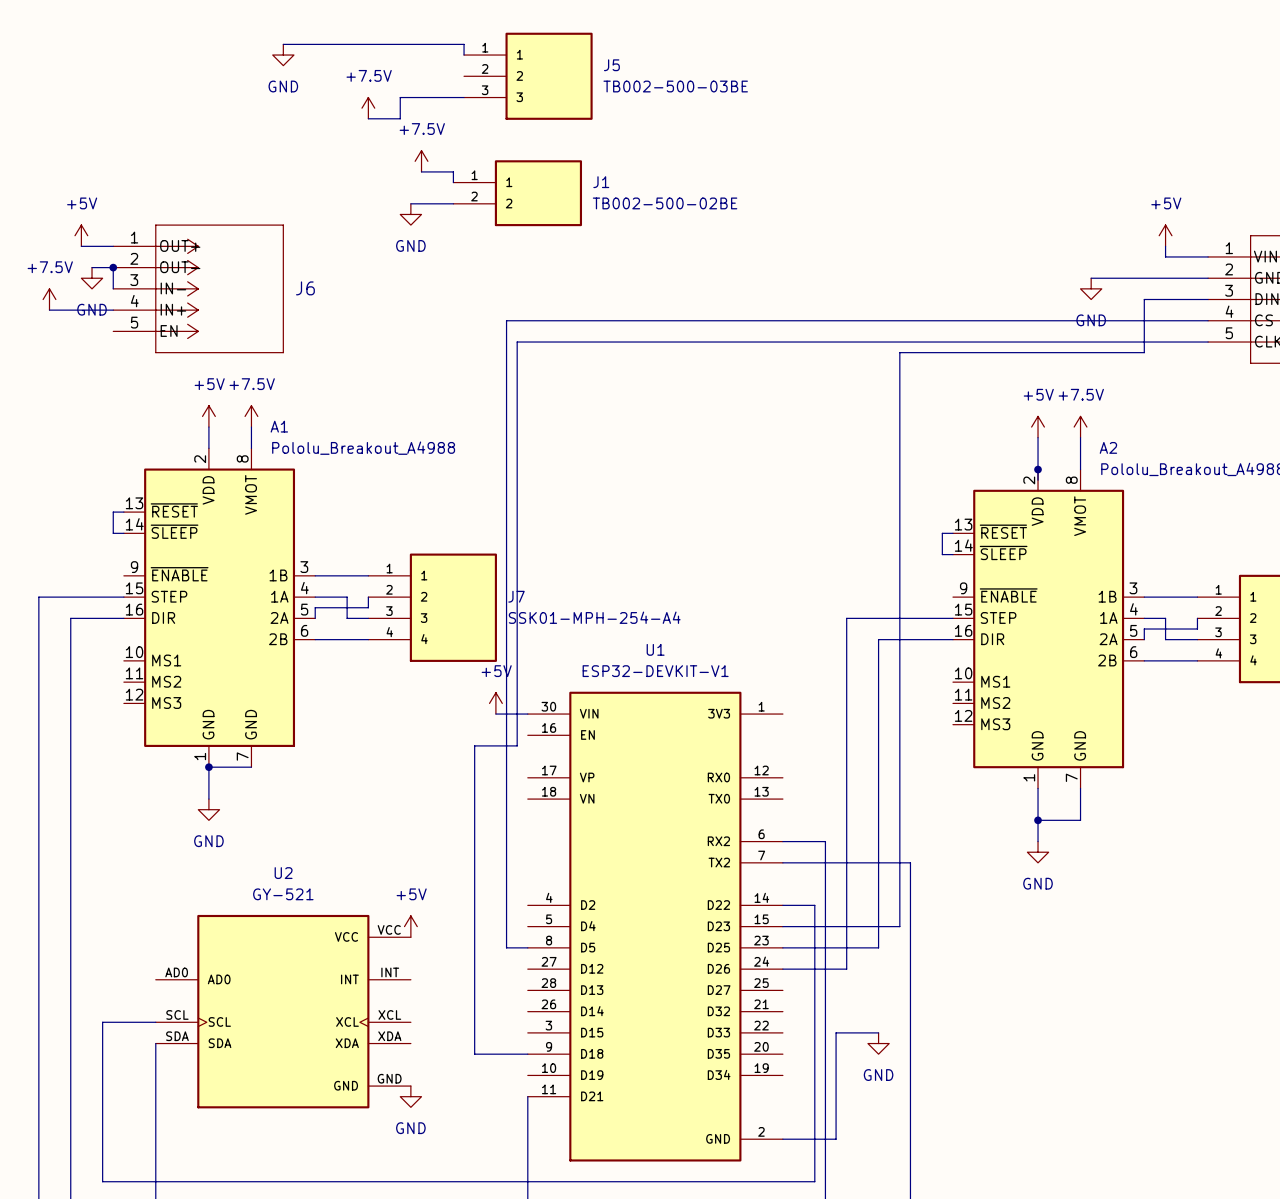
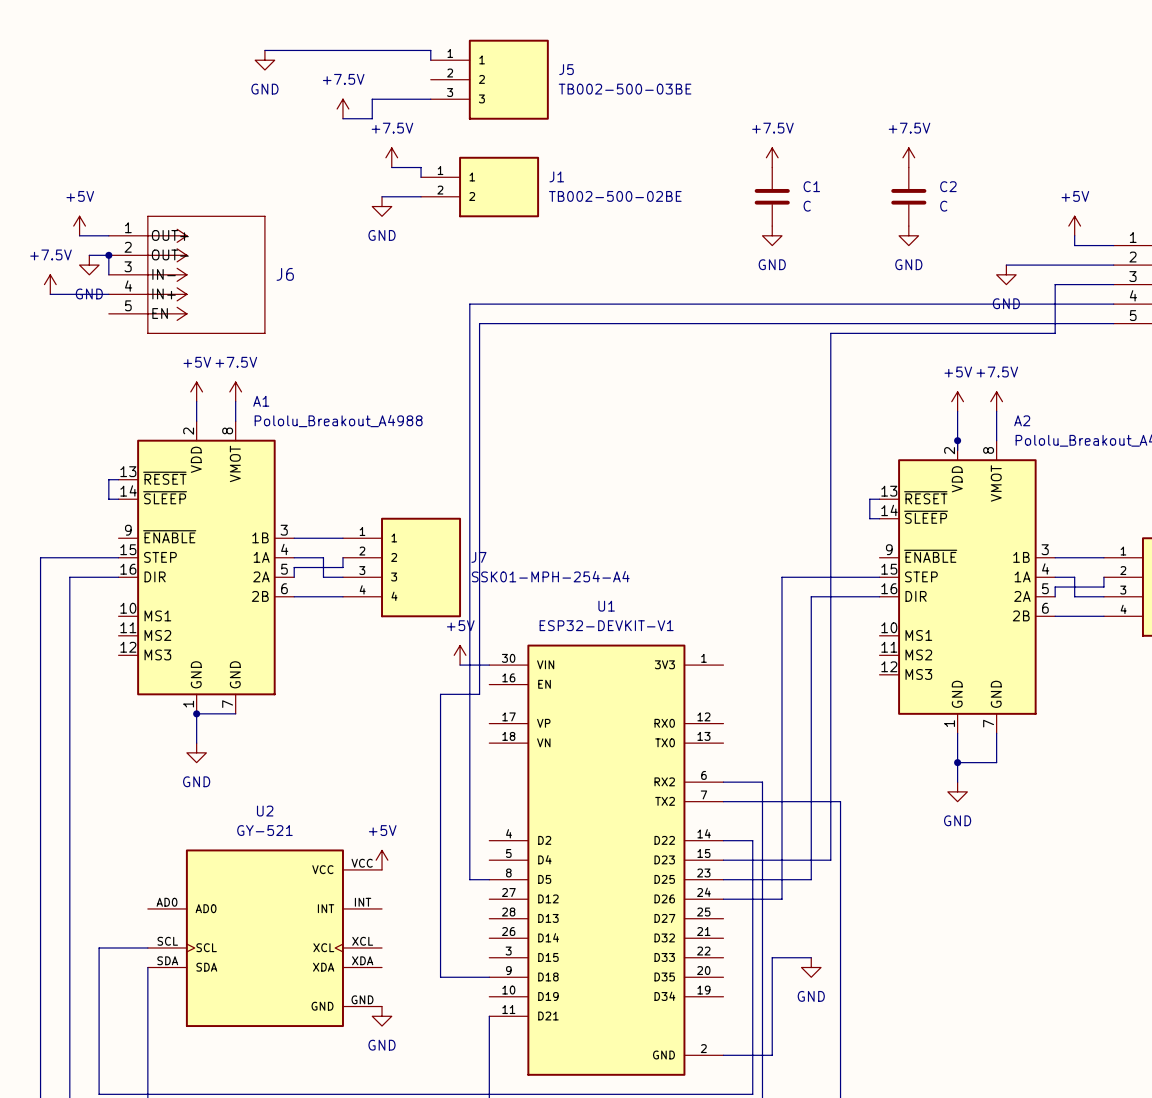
power symbol: none -> +7.5V (772, 157)
power symbol: none -> +7.5V (908, 157)
C1: none -> C (772, 196)
C2: none -> C (908, 196)
power symbol: none -> GND (772, 235)
power symbol: none -> GND (908, 235)

